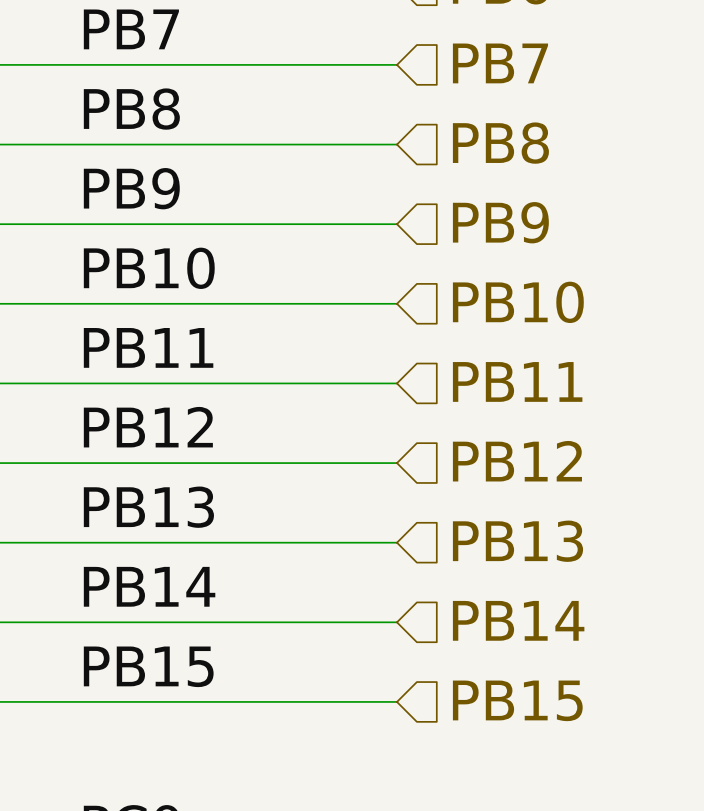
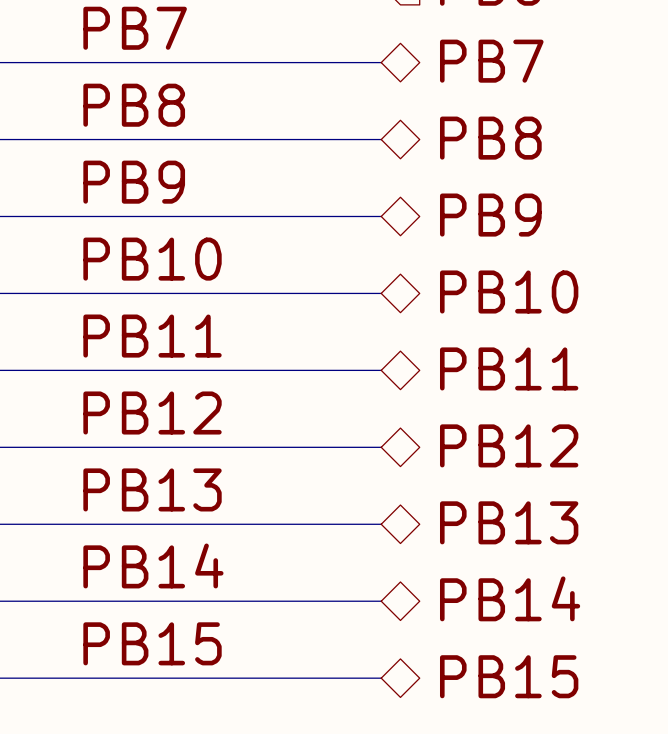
hierarchical label shape: input (500, 63) -> bidirectional (491, 61)
hierarchical label shape: input (500, 143) -> bidirectional (490, 138)
hierarchical label shape: input (500, 222) -> bidirectional (490, 215)
hierarchical label shape: input (518, 302) -> bidirectional (509, 291)
hierarchical label shape: input (517, 381) -> bidirectional (509, 368)
hierarchical label shape: input (517, 461) -> bidirectional (509, 445)
hierarchical label shape: input (517, 541) -> bidirectional (509, 522)
hierarchical label shape: input (518, 620) -> bidirectional (510, 598)
hierarchical label shape: input (517, 700) -> bidirectional (509, 676)

